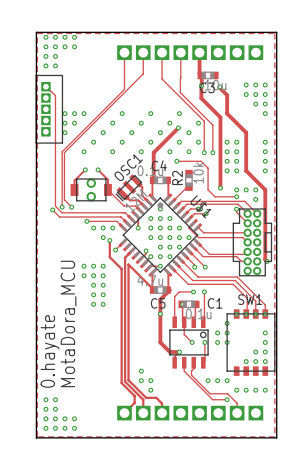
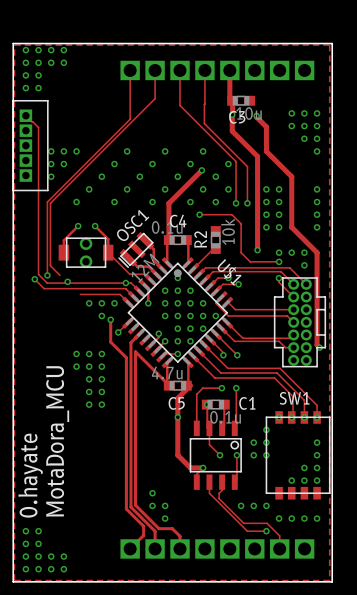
via: (71, 207) -> none
via: none -> (67, 281)
via: none -> (125, 283)
via: (86, 221) -> none

